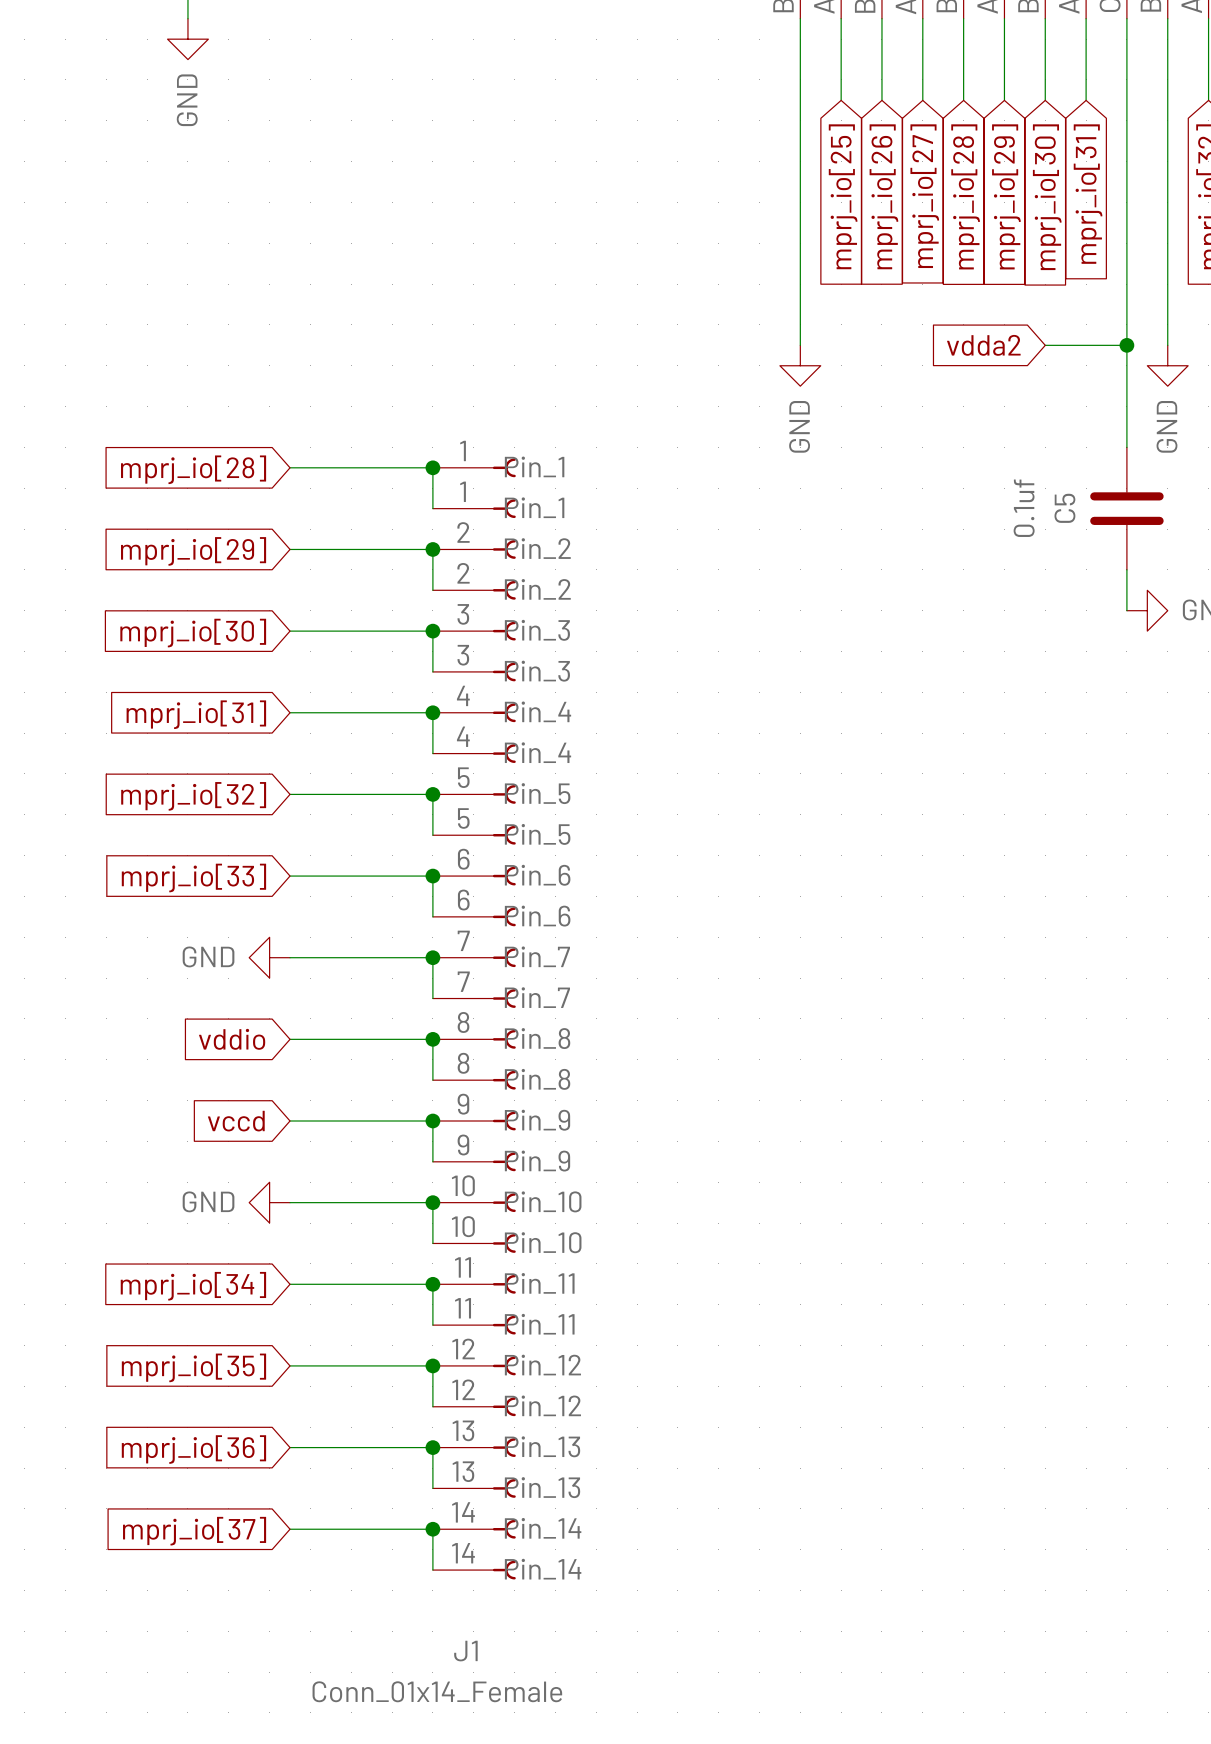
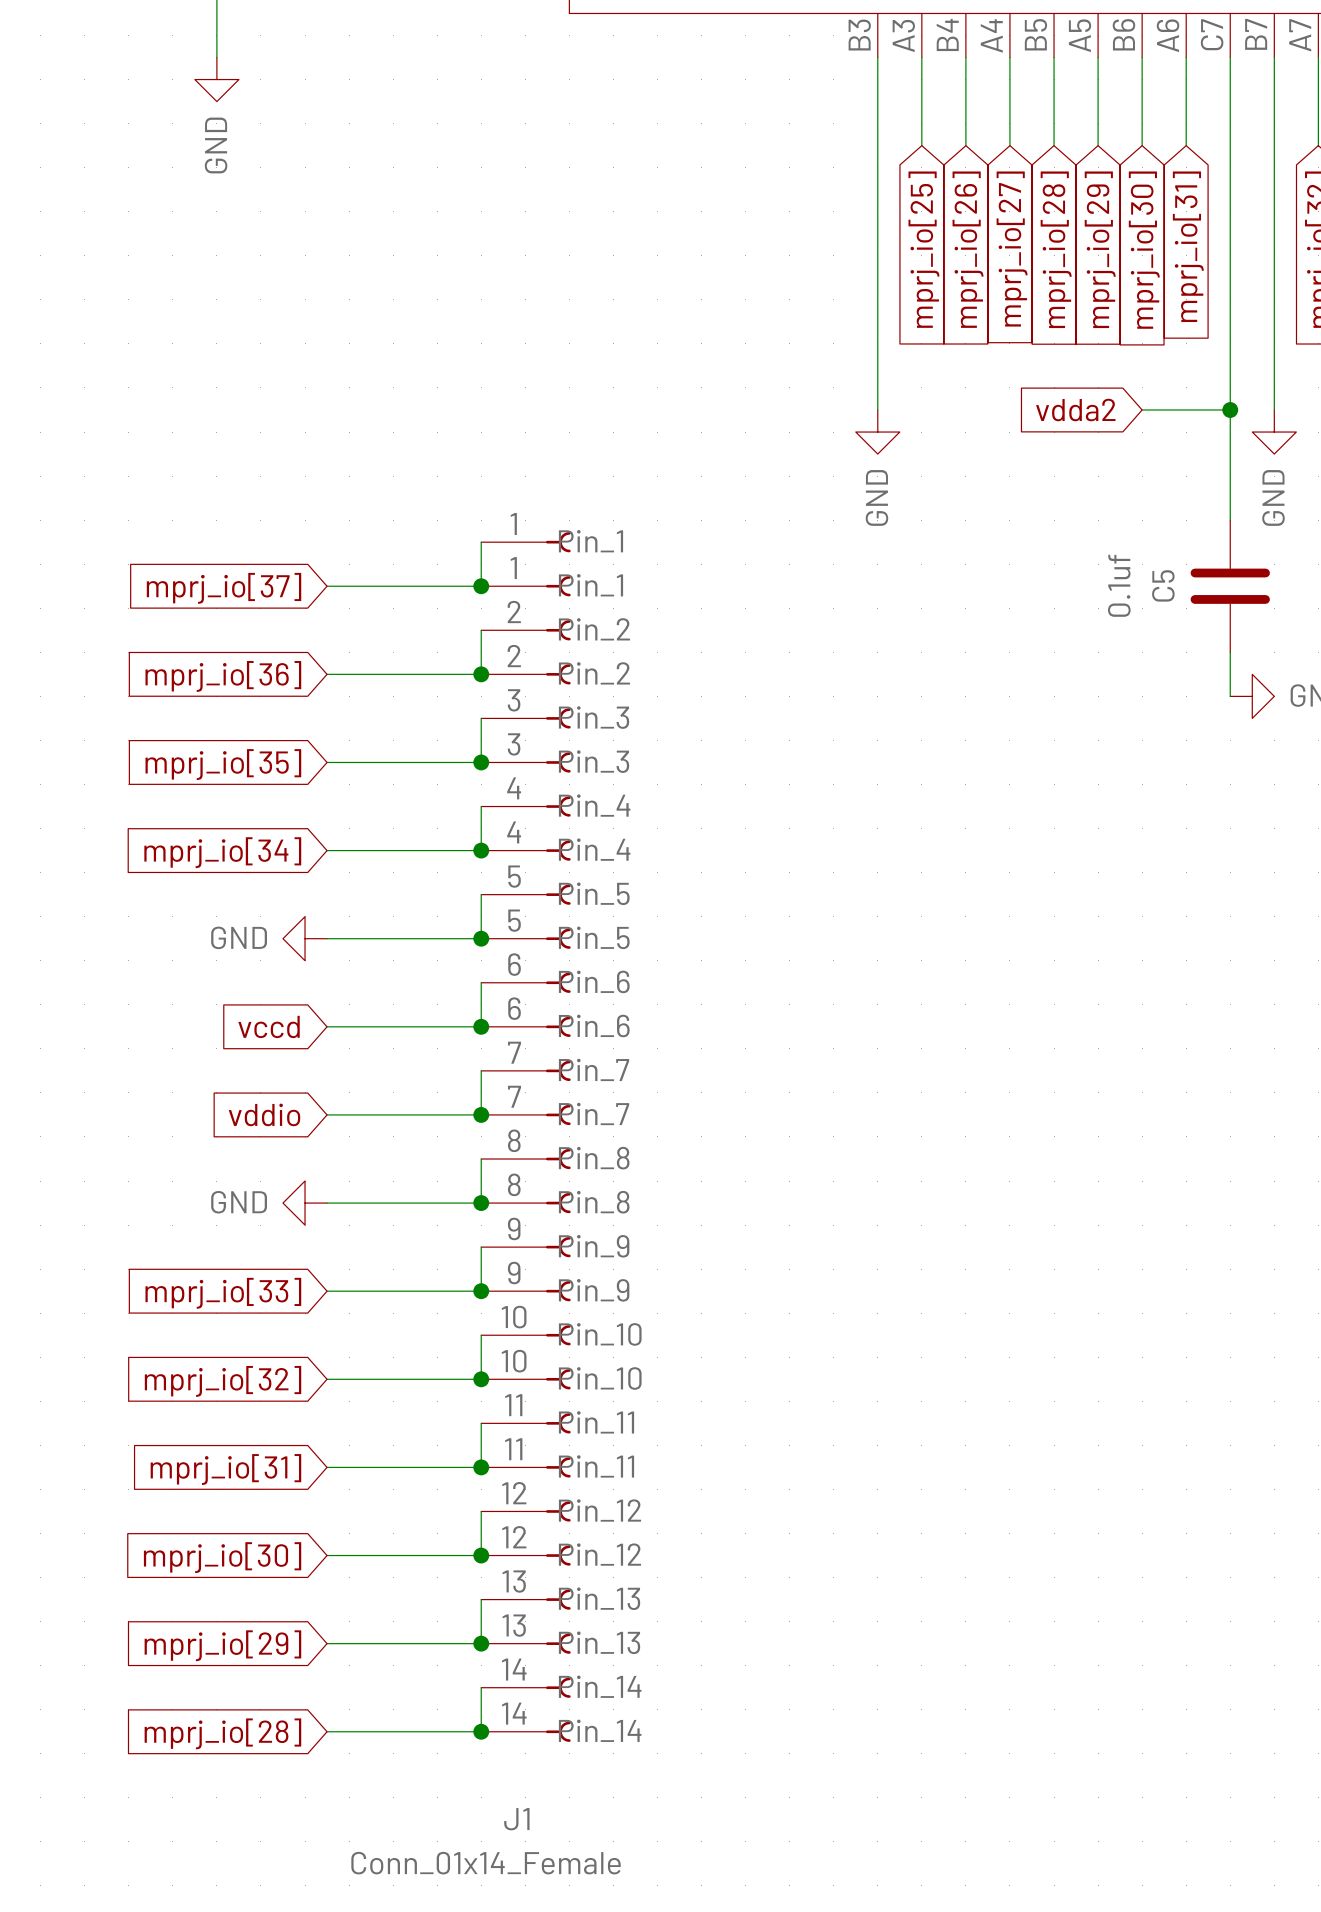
wire: (290, 467) (432, 467) -> (327, 586) (481, 586)
junction: (432, 467) -> none
global label: mprj_io[28] (193, 469) -> none
junction: none -> (481, 586)
global label: none -> mprj_io[37] (224, 588)
wire: (290, 549) (432, 549) -> (327, 674) (481, 674)
junction: (432, 549) -> none
global label: mprj_io[29] (193, 551) -> none
junction: none -> (481, 674)
global label: none -> mprj_io[36] (223, 676)
wire: (290, 631) (432, 631) -> (327, 762) (481, 762)
junction: (432, 631) -> none
global label: mprj_io[30] (193, 633) -> none
junction: none -> (481, 762)
global label: none -> mprj_io[35] (223, 764)
wire: (290, 712) (432, 712) -> (327, 850) (481, 850)
junction: (432, 712) -> none
global label: mprj_io[31] (196, 714) -> none
junction: none -> (481, 850)
global label: none -> mprj_io[34] (222, 852)
wire: (290, 794) (432, 794) -> (327, 938) (481, 938)
junction: (432, 794) -> none
global label: mprj_io[32] (193, 796) -> none
power symbol: none -> GND (305, 938)
junction: none -> (481, 938)
wire: (290, 876) (432, 876) -> (327, 1026) (481, 1026)
junction: (432, 876) -> none
global label position: mprj_io[33] (193, 878) -> mprj_io[33] (223, 1293)
junction: none -> (481, 1026)
power symbol: GND (269, 957) -> none
wire: (290, 957) (432, 957) -> (327, 1114) (481, 1114)
junction: (432, 957) -> none
junction: none -> (481, 1114)
global label position: vddio (232, 1039) -> vddio (264, 1114)
wire: (290, 1039) (432, 1039) -> (327, 1203) (481, 1203)
junction: (432, 1039) -> none
power symbol: none -> GND (305, 1203)
junction: none -> (481, 1203)
global label position: vccd (236, 1121) -> vccd (269, 1026)
wire: (290, 1121) (432, 1121) -> (327, 1291) (481, 1291)
junction: (432, 1121) -> none
junction: none -> (481, 1291)
power symbol: GND (269, 1202) -> none
wire: (290, 1202) (432, 1202) -> (327, 1379) (481, 1379)
junction: (432, 1202) -> none
junction: none -> (481, 1379)
global label: none -> mprj_io[32] (223, 1381)
wire: (290, 1284) (432, 1284) -> (327, 1467) (481, 1467)
junction: (432, 1284) -> none
global label: mprj_io[34] (193, 1286) -> none
junction: none -> (481, 1467)
global label: none -> mprj_io[31] (225, 1469)
wire: (290, 1365) (432, 1365) -> (327, 1555) (481, 1555)
junction: (432, 1365) -> none
global label: mprj_io[35] (193, 1367) -> none
junction: none -> (481, 1555)
global label: none -> mprj_io[30] (222, 1557)
wire: (290, 1447) (432, 1447) -> (327, 1643) (481, 1643)
junction: (432, 1447) -> none
global label: mprj_io[36] (193, 1449) -> none
junction: none -> (481, 1643)
global label: none -> mprj_io[29] (222, 1645)
wire: (290, 1529) (432, 1529) -> (327, 1731) (481, 1731)
junction: (432, 1529) -> none
global label: mprj_io[37] (194, 1531) -> none
junction: none -> (481, 1731)
global label: none -> mprj_io[28] (222, 1733)

